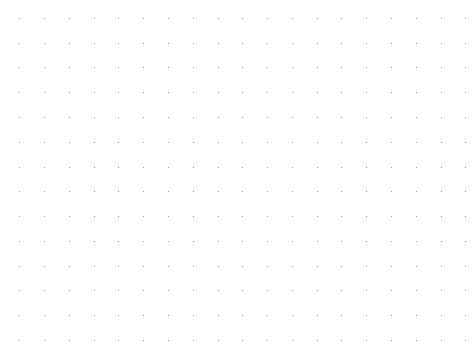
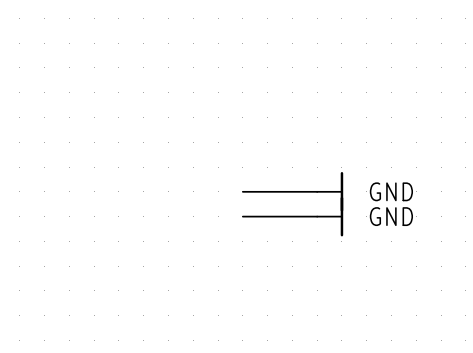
wire: none -> (242, 191) (317, 191)
power symbol: none -> GND (330, 191)
wire: none -> (242, 216) (317, 216)
power symbol: none -> GND (330, 216)

